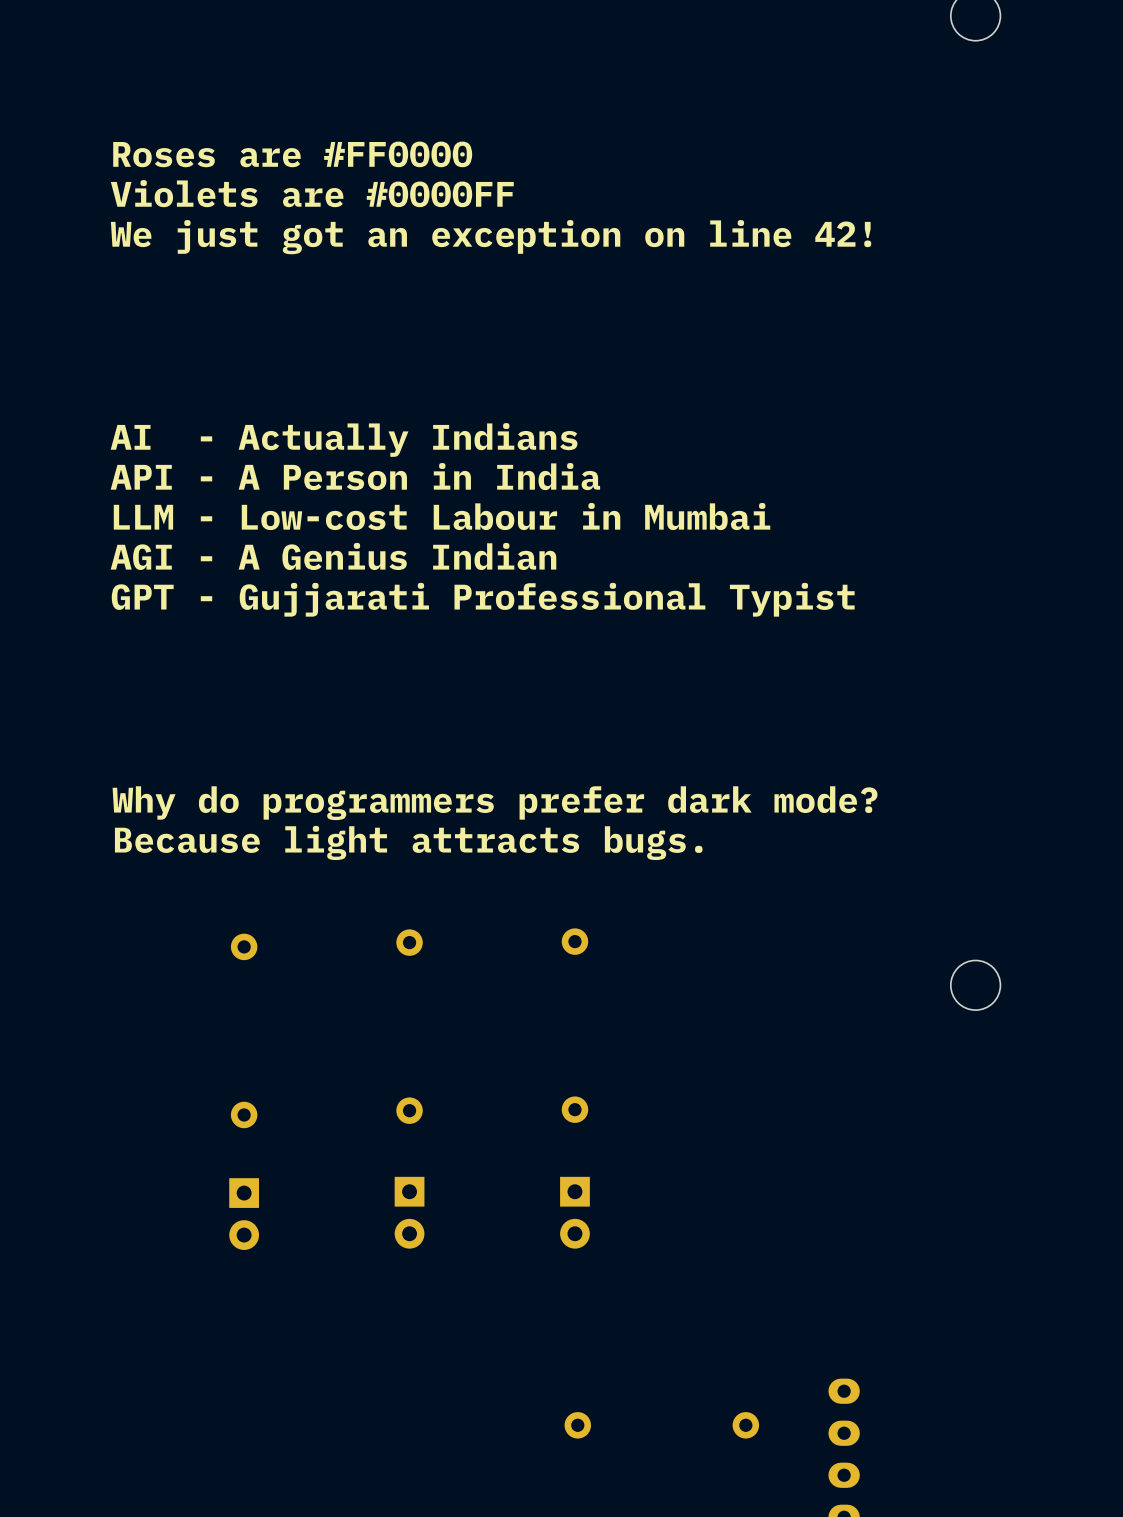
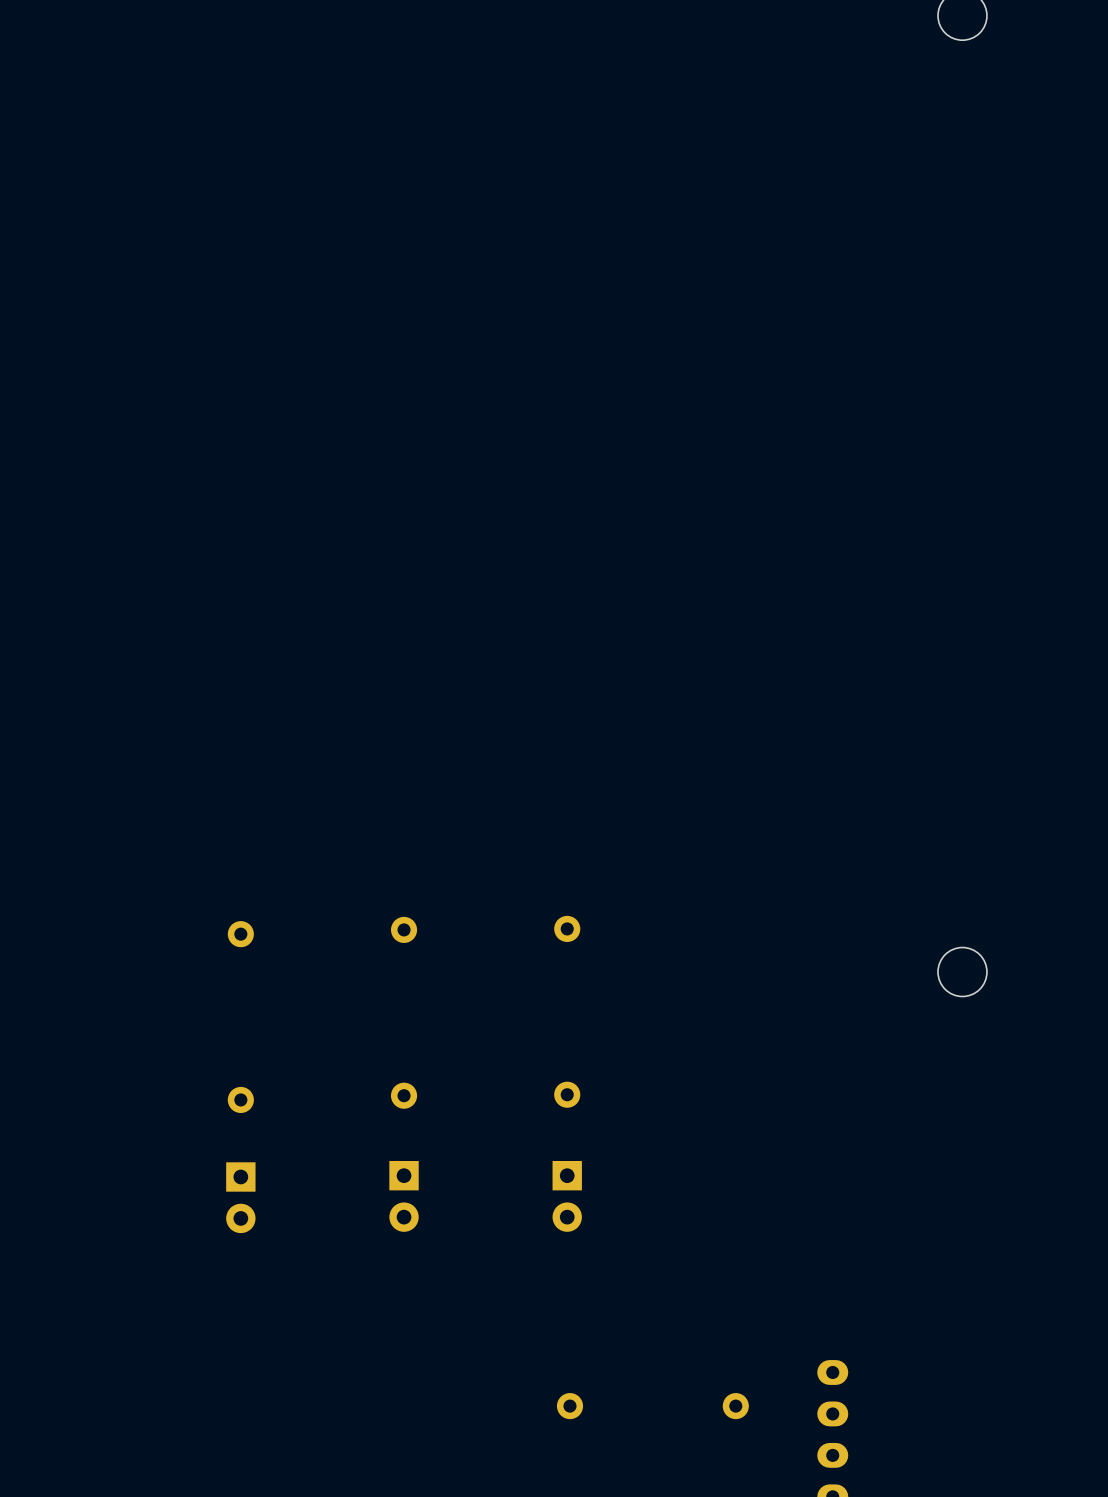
text: Roses are #FF0000 (292, 154) -> none
text: Violets are #0000FF (312, 193) -> none
text: We just got an exception on line 42! (491, 237) -> none
text: AI - Actually Indians (344, 439) -> none
text: API - A Person in India (355, 476) -> none
text: LLM - Low-cost Labour in Mumbai (442, 516) -> none
text: AGI - A Genius Indian (333, 556) -> none
text: GPT - Gujjarati Professional Typist (483, 599) -> none
text: Why do programmers prefer dark mode? (495, 803) -> none
text: Because light attracts bugs. (408, 842) -> none

